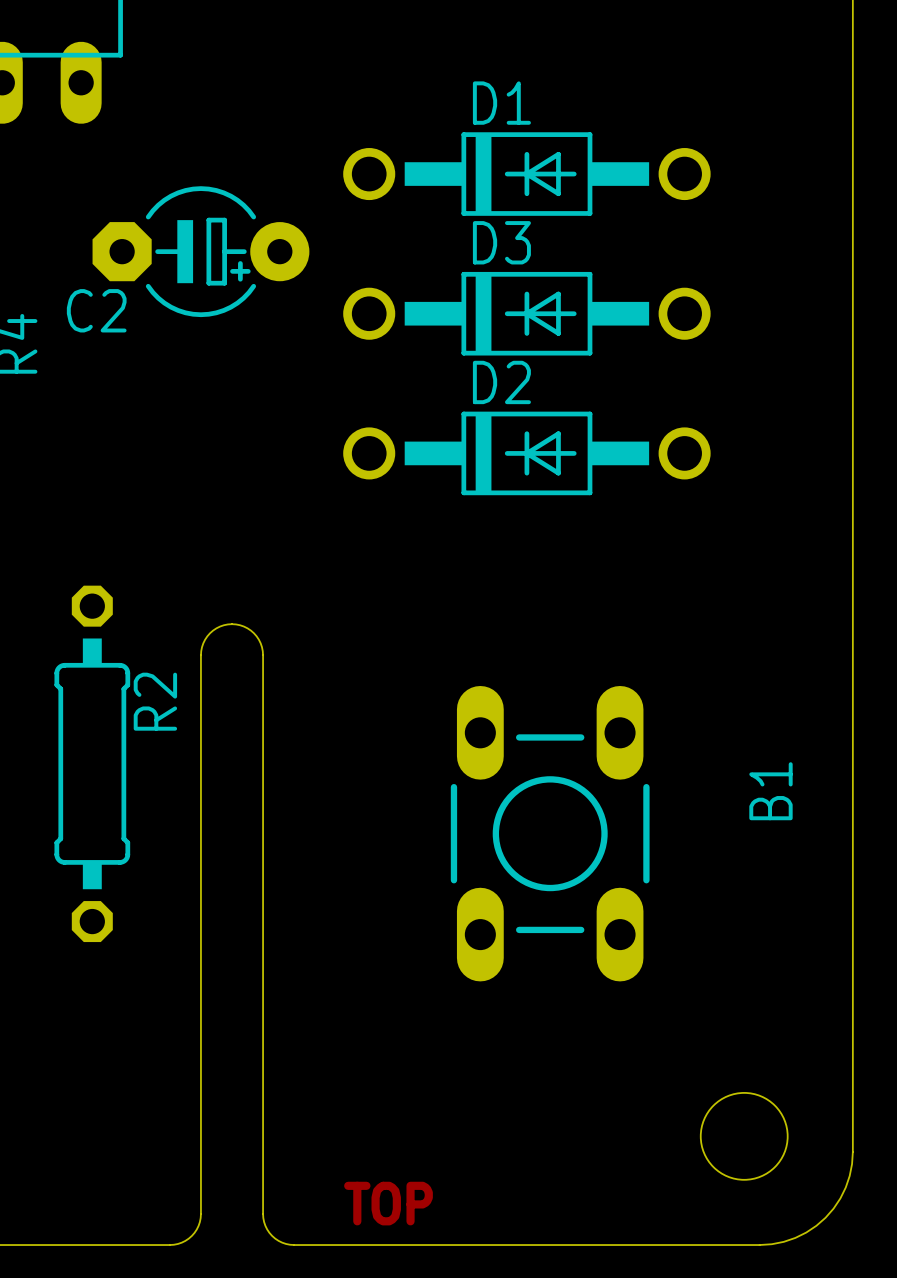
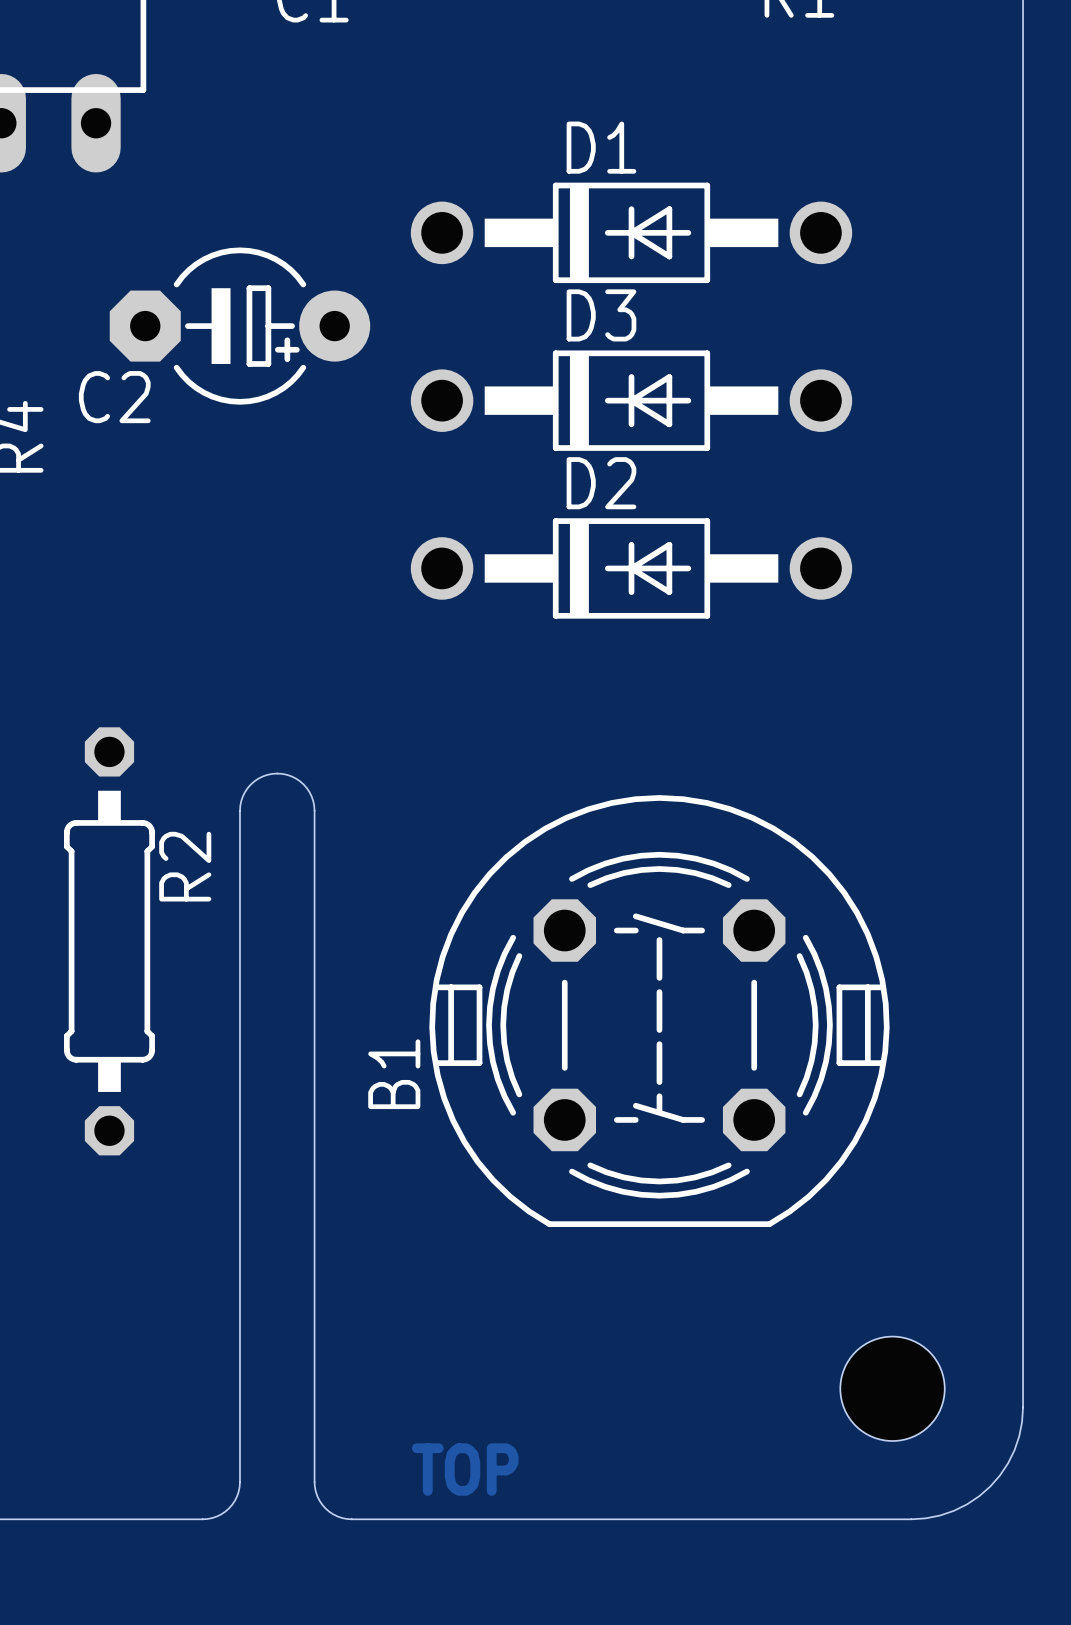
B1 footprint: [450, 686, 650, 982] -> [429, 795, 890, 1227]
B1 name position: B1 (770, 791) -> B1 (394, 1074)

